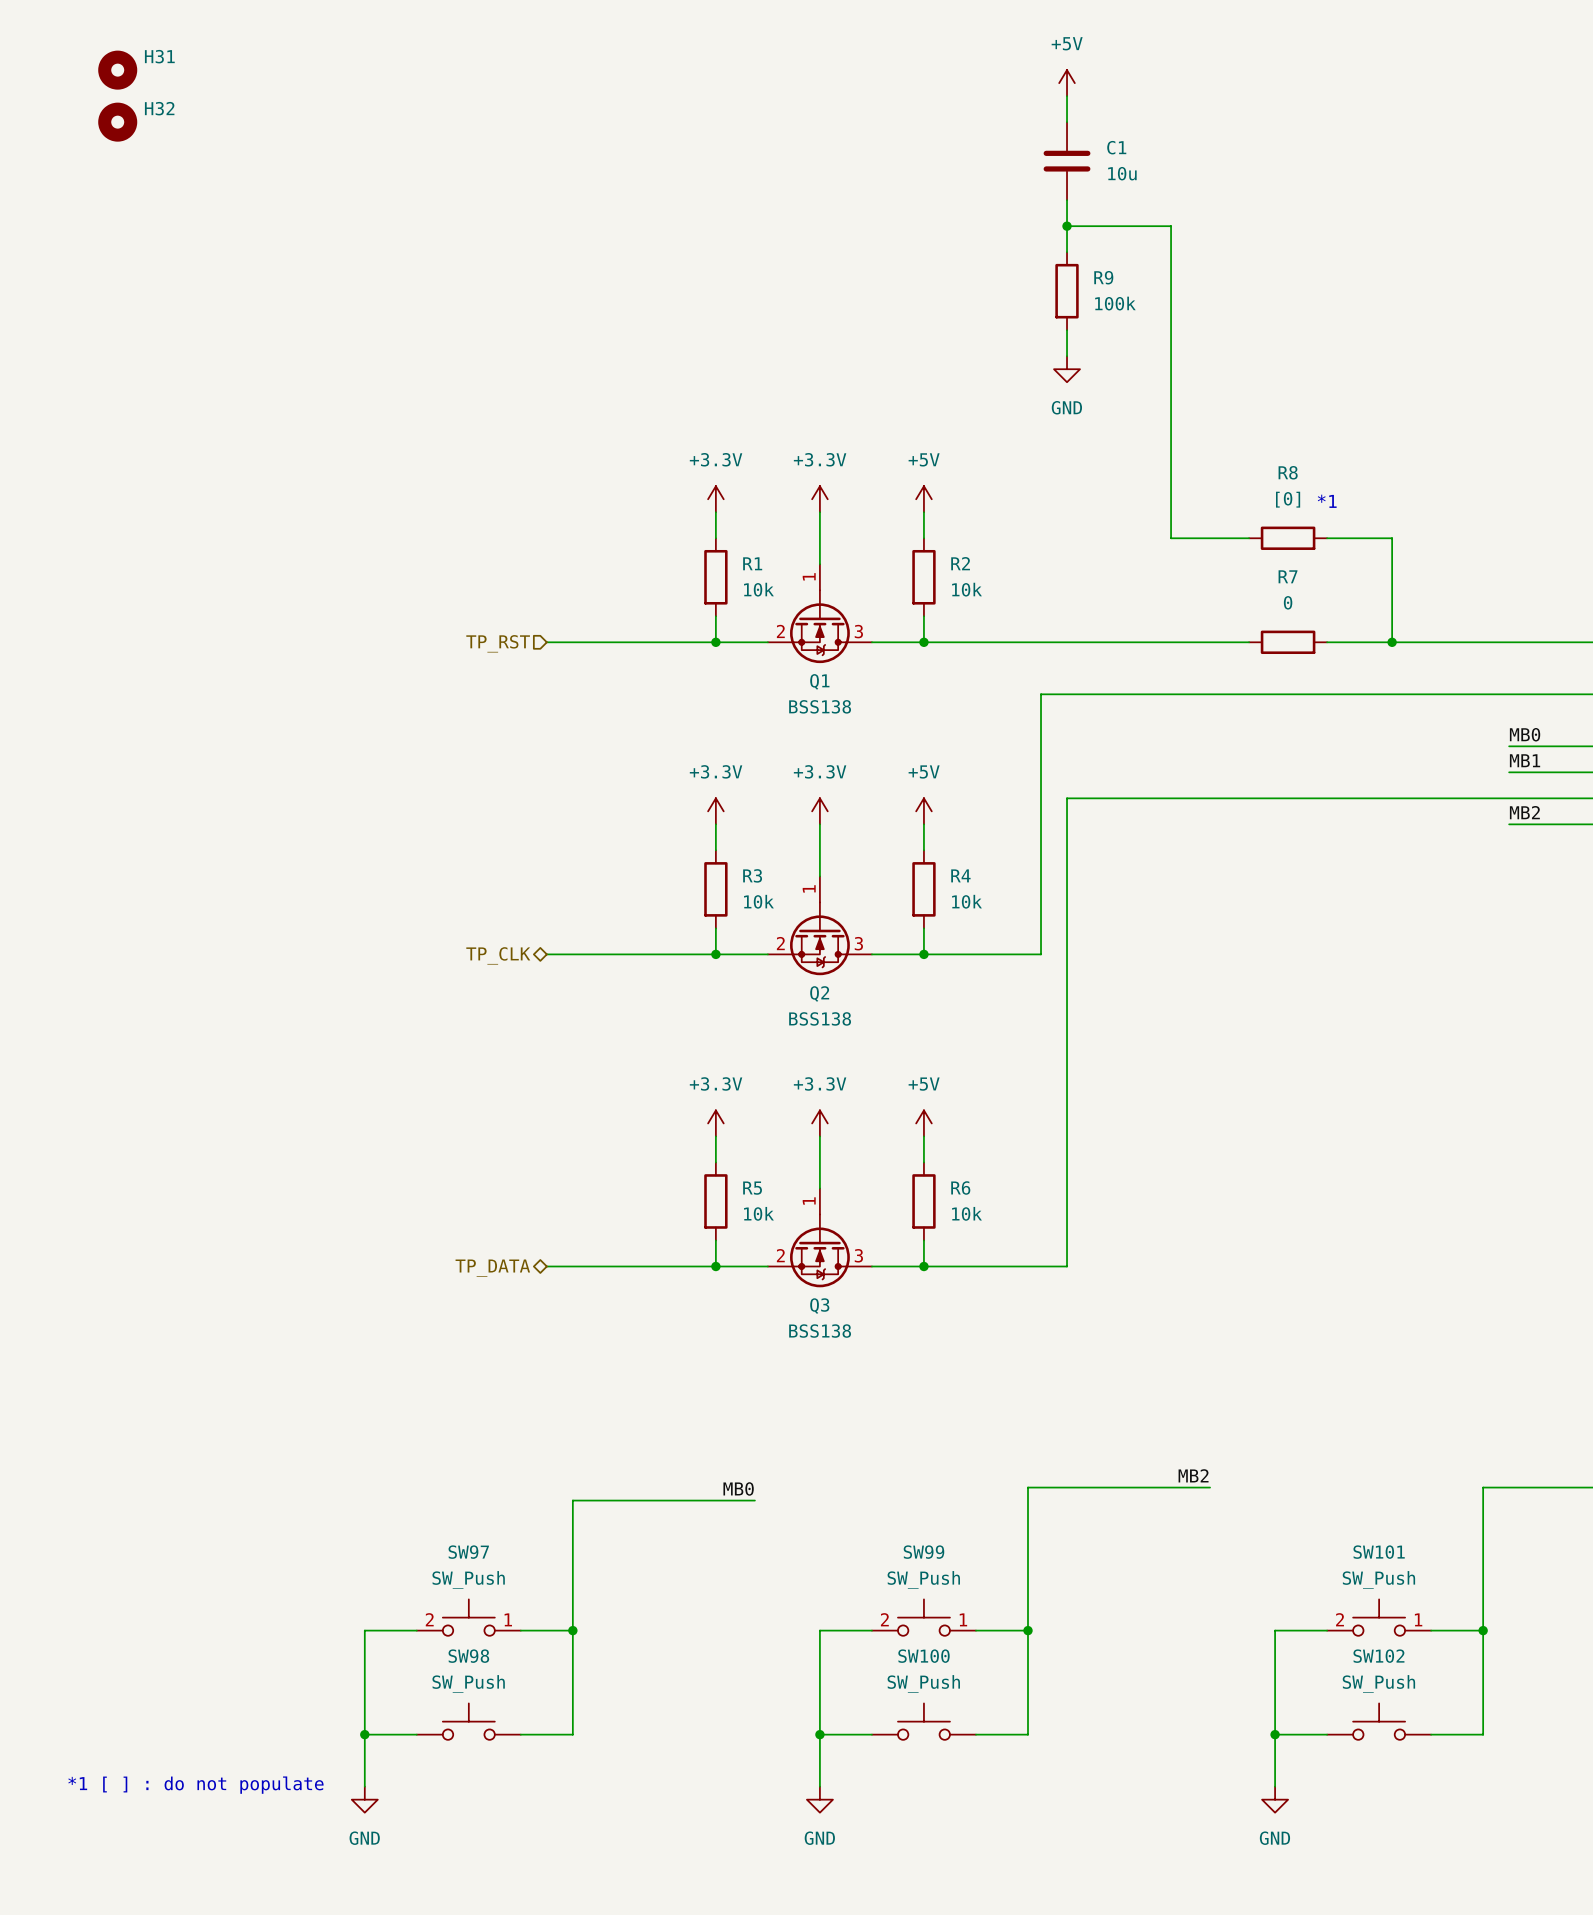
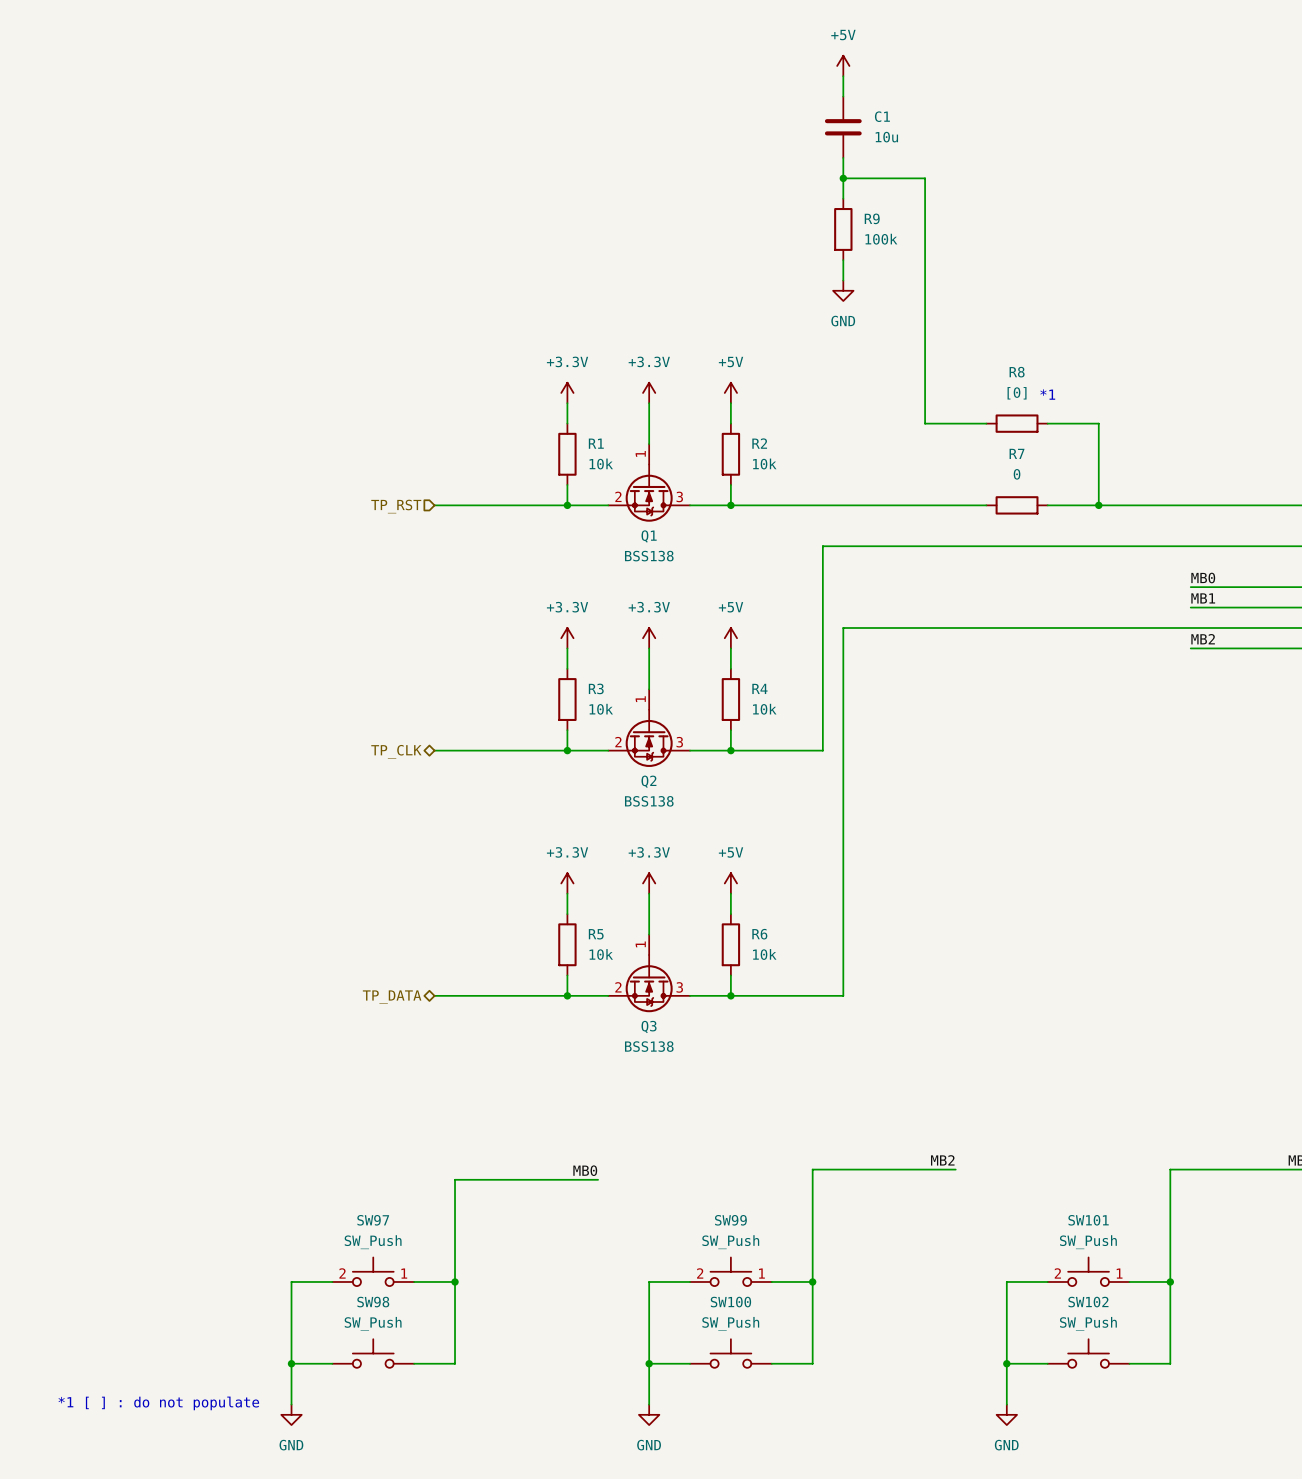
H31: (117, 70) -> none
H32: (117, 122) -> none

